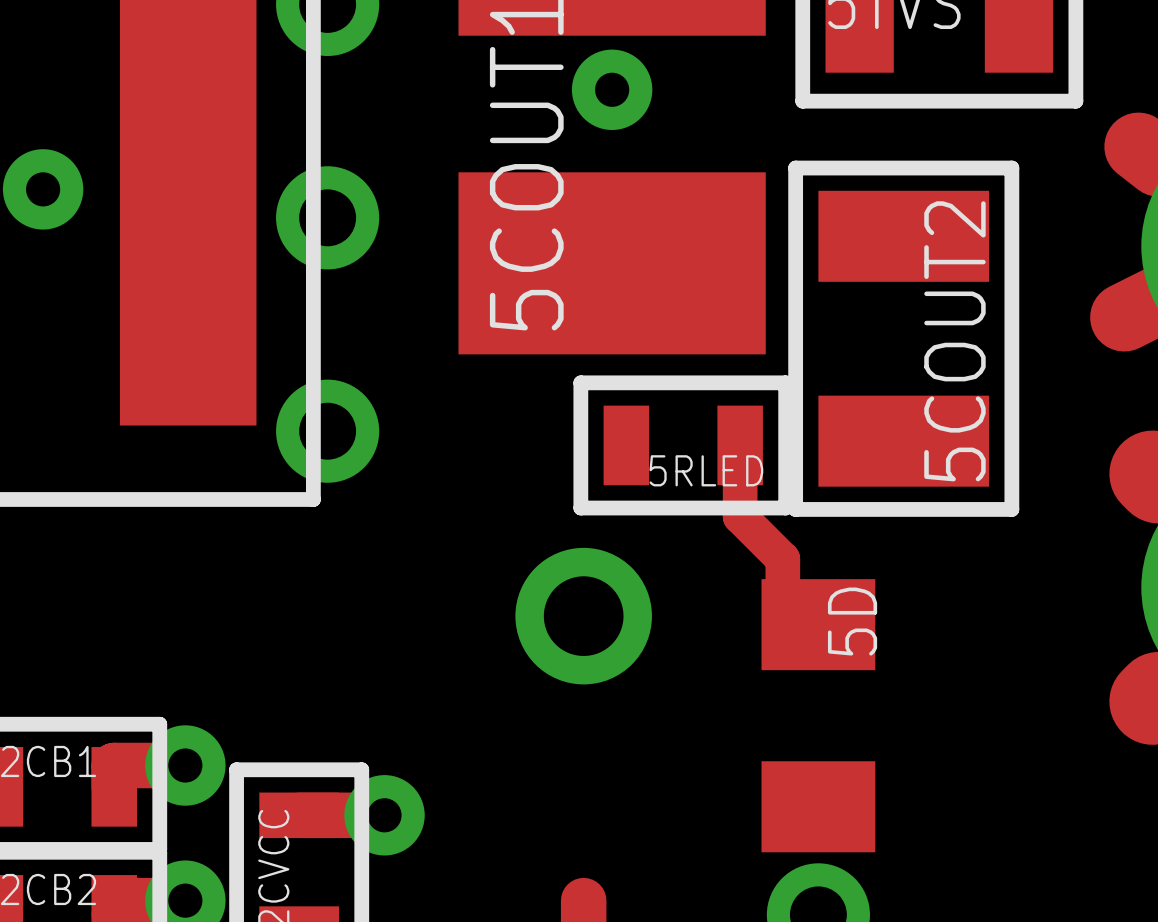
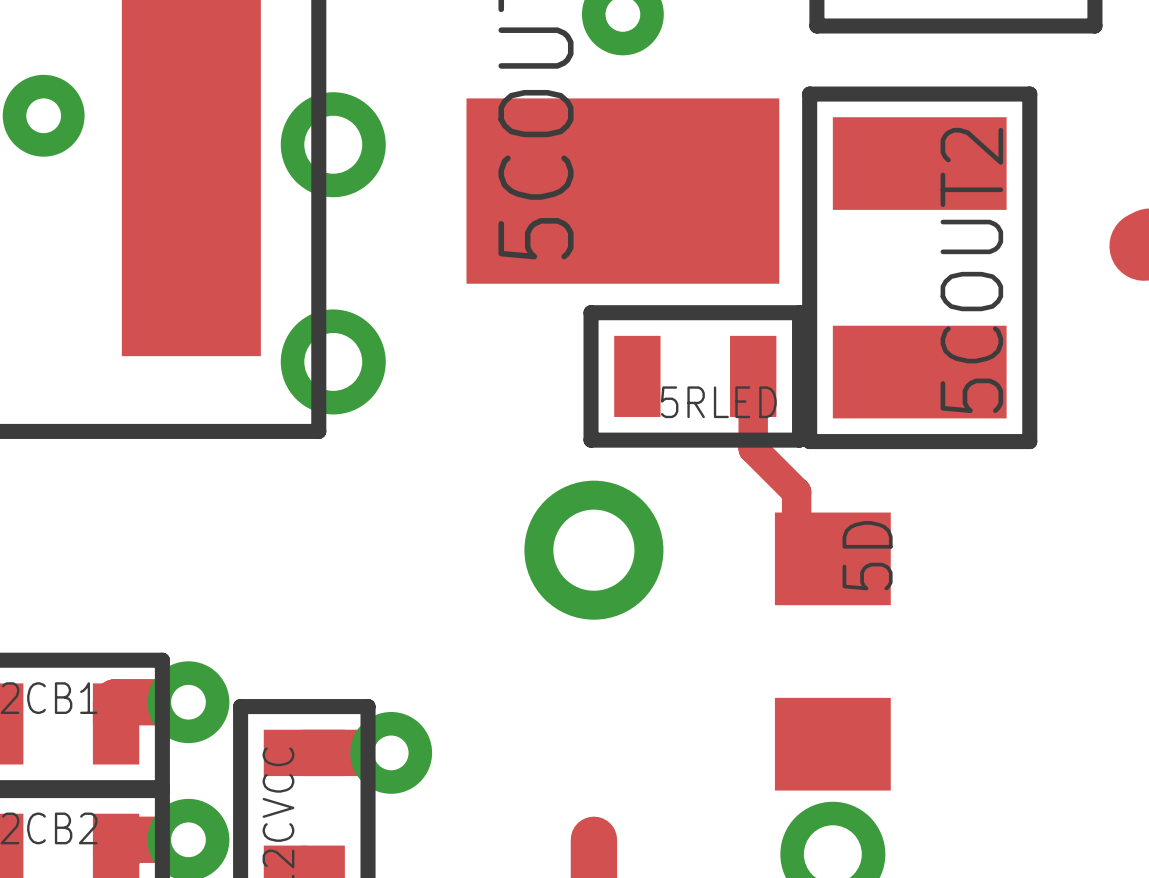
track width: thick (740, 445) (740, 516) (782, 559) (782, 589) (818, 624) -> thin (753, 376) (753, 448) (796, 492) (796, 522) (832, 558)

